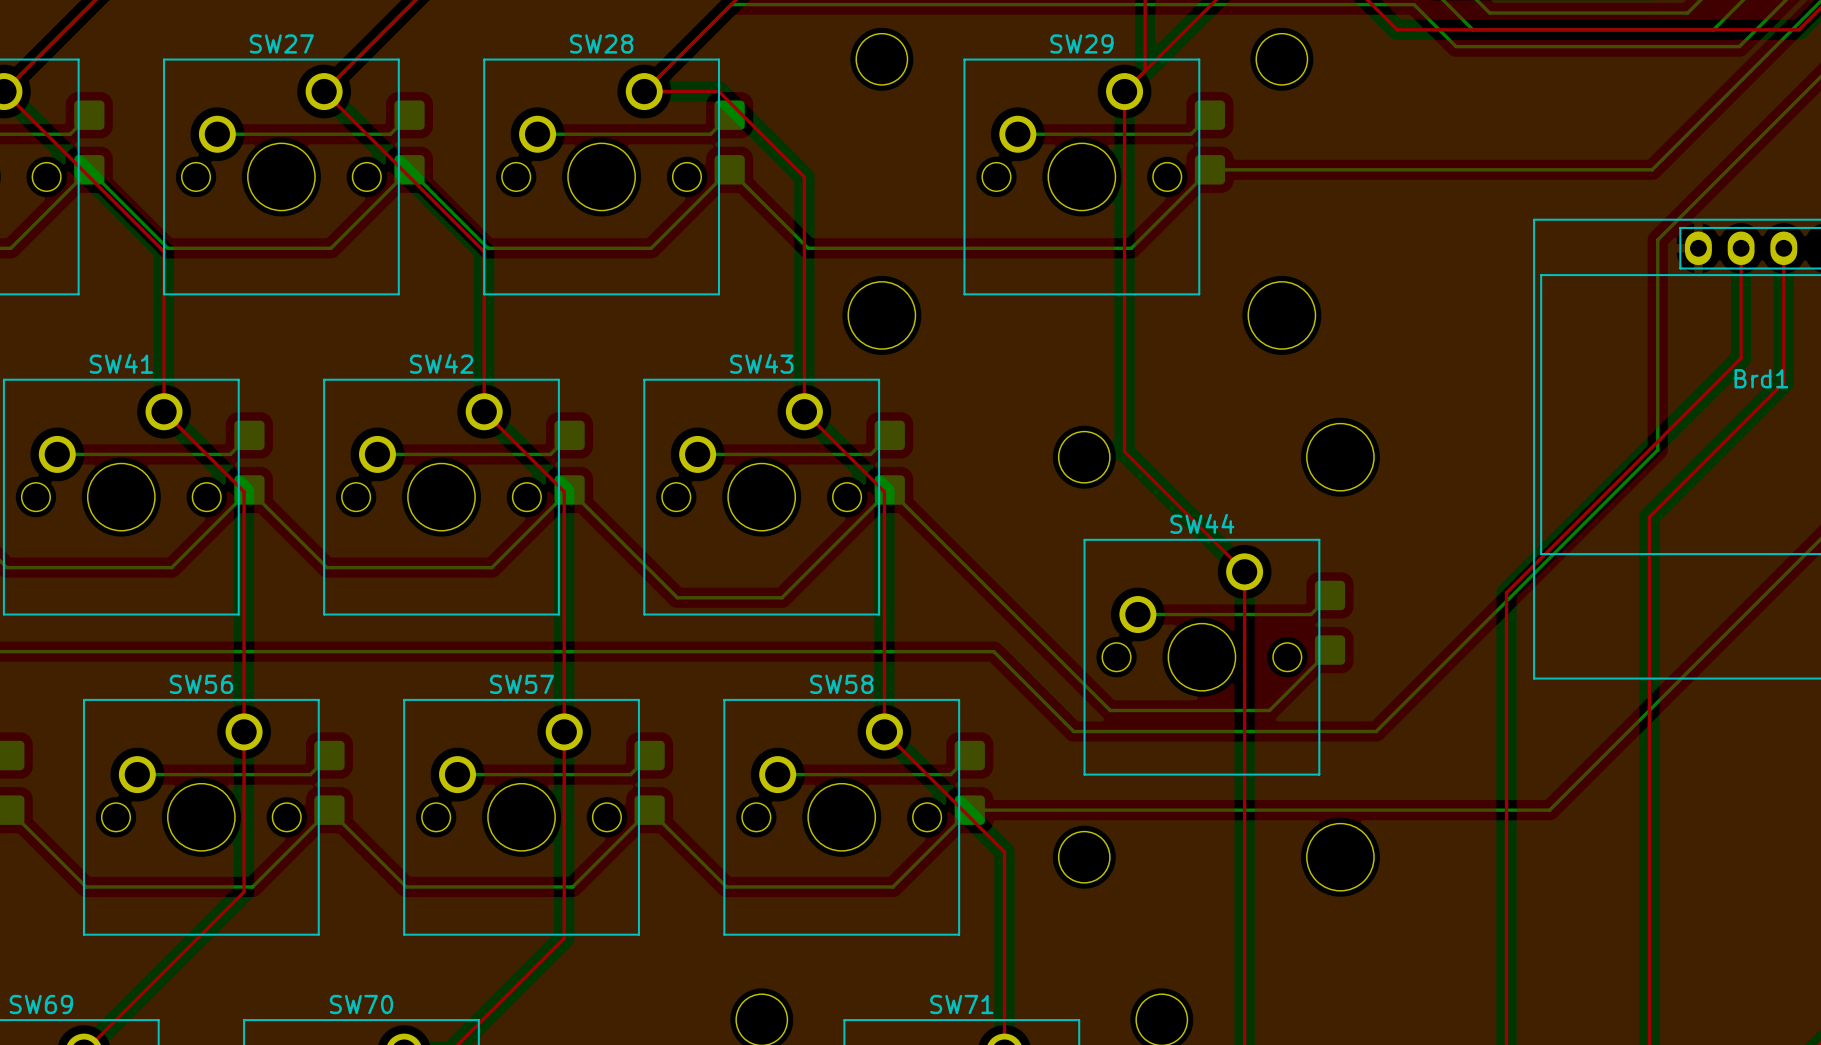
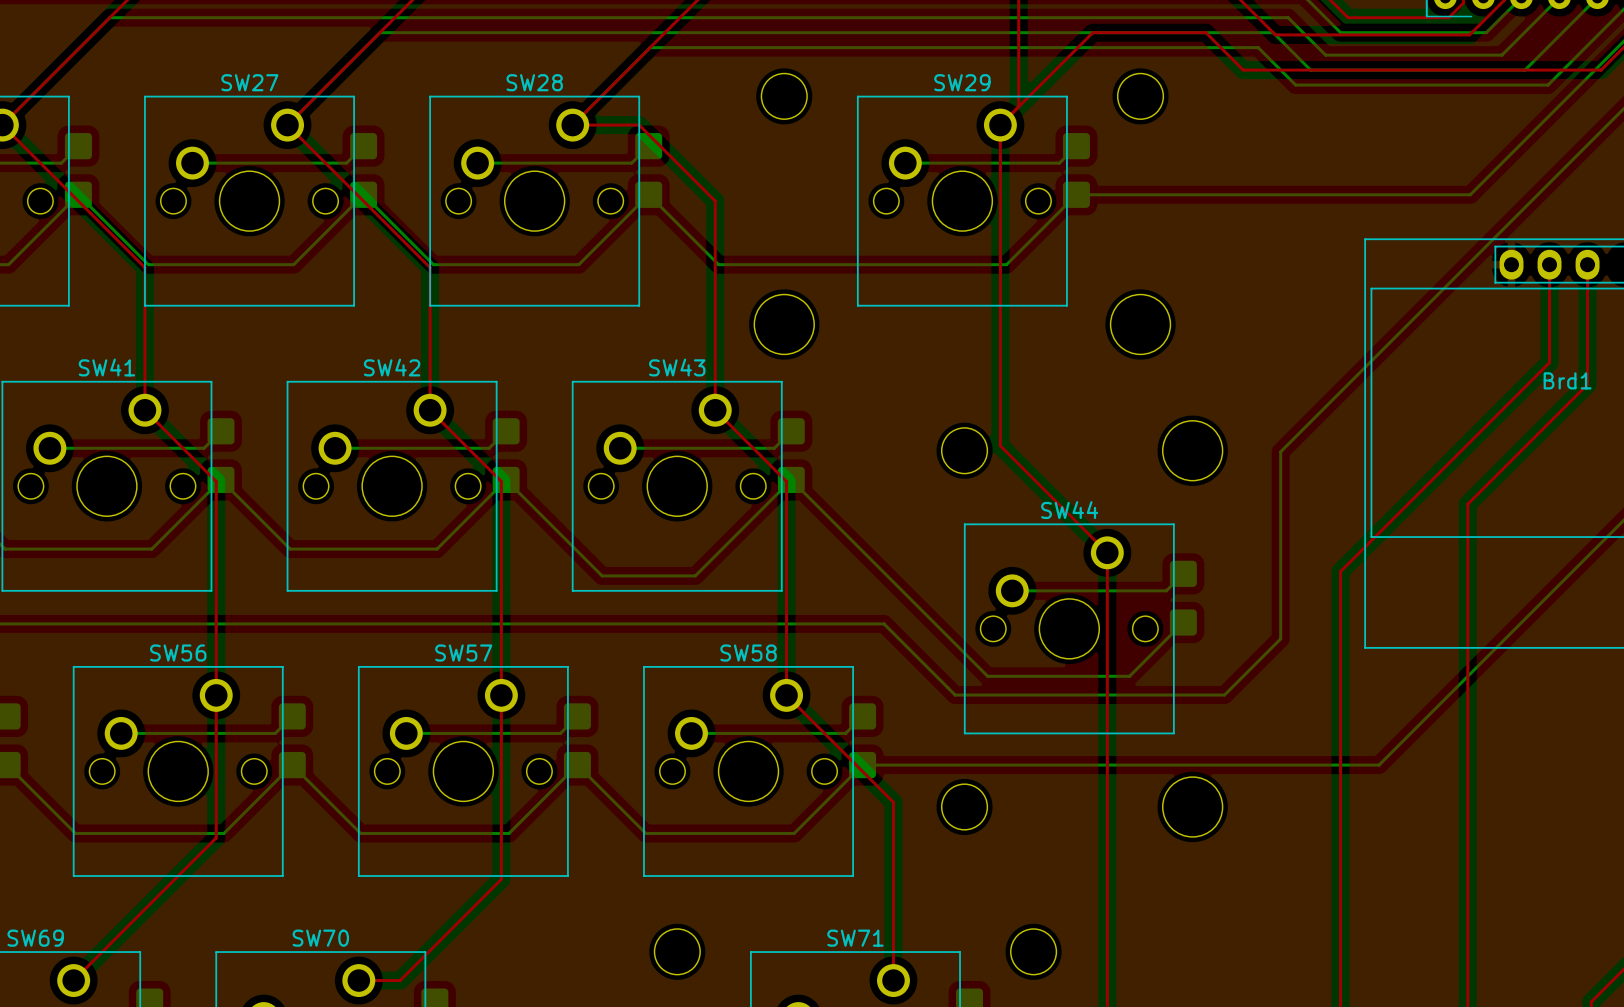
bottom track: (1657, 239) (1657, 449) (1439, 668) -> (1475, 257) (1280, 451) (1280, 638)

